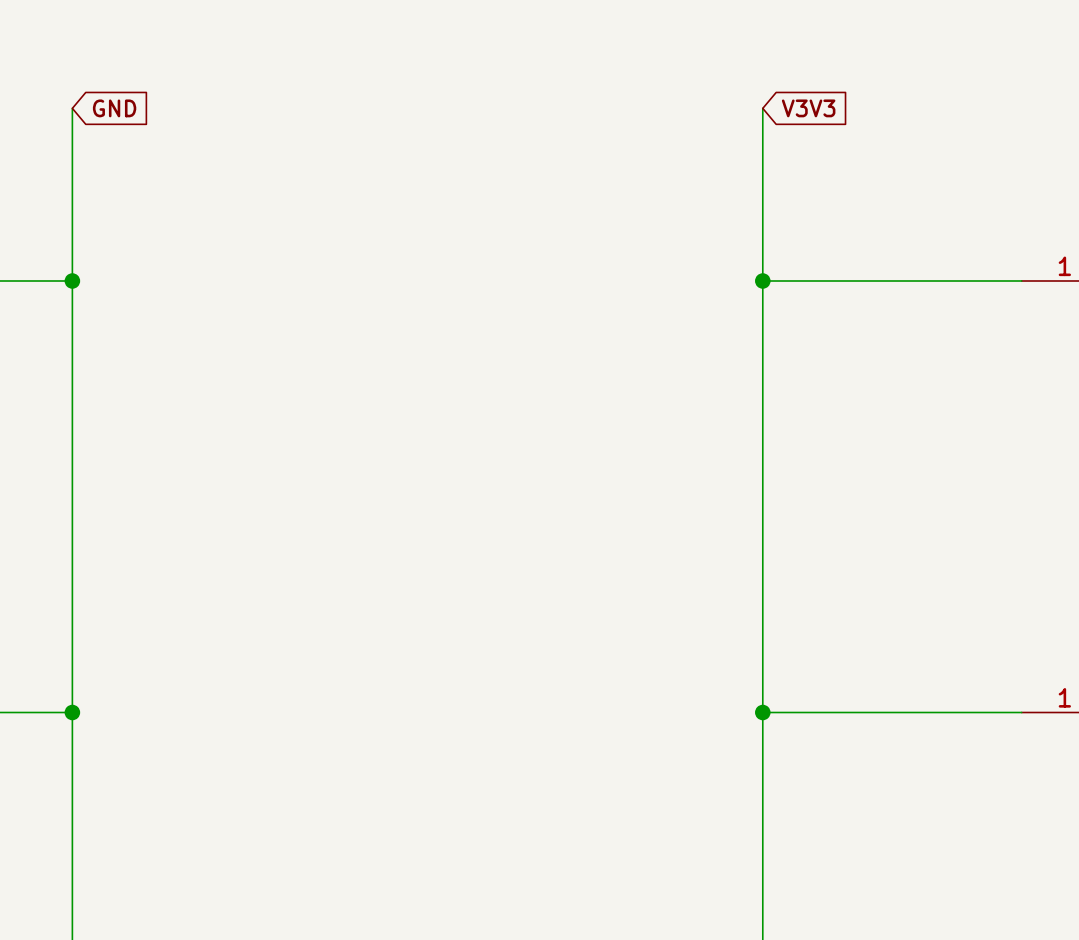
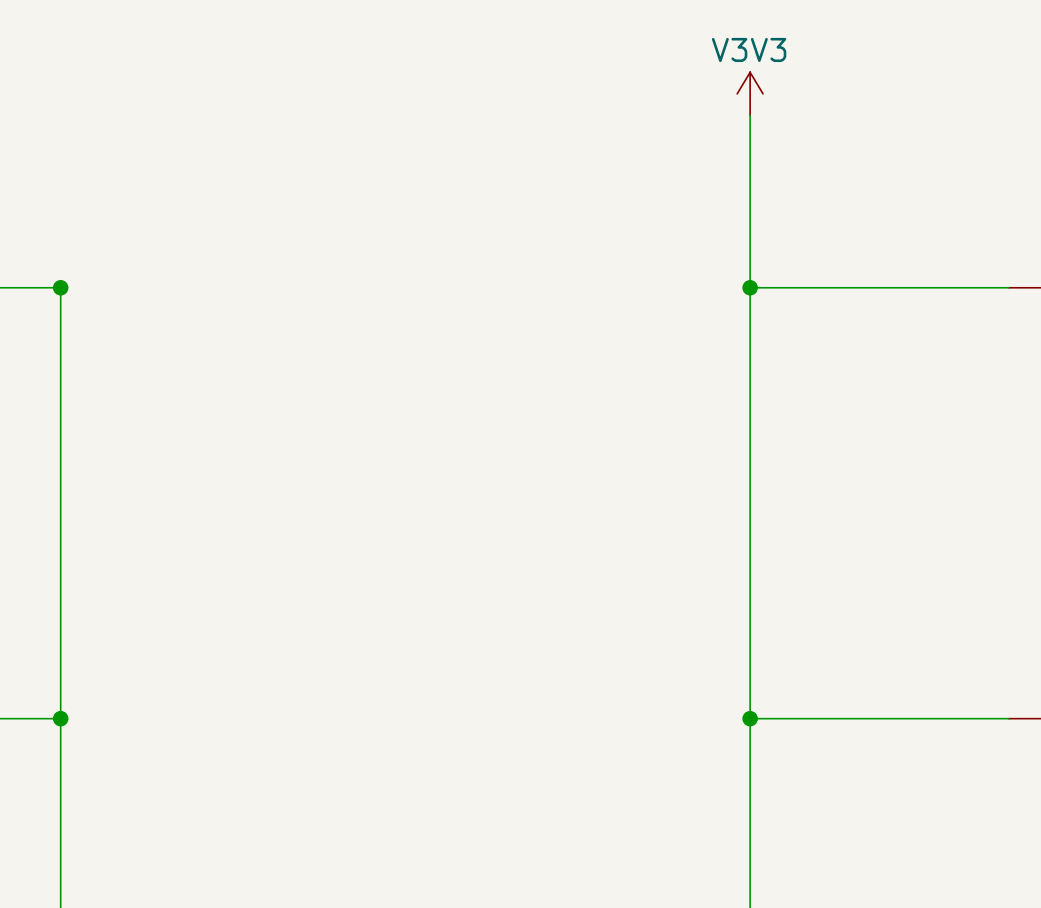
power symbol: none -> V3V3 (750, 93)
wire: (72, 108) (72, 280) -> none
global label: GND (114, 108) -> none
global label: V3V3 (808, 108) -> none

